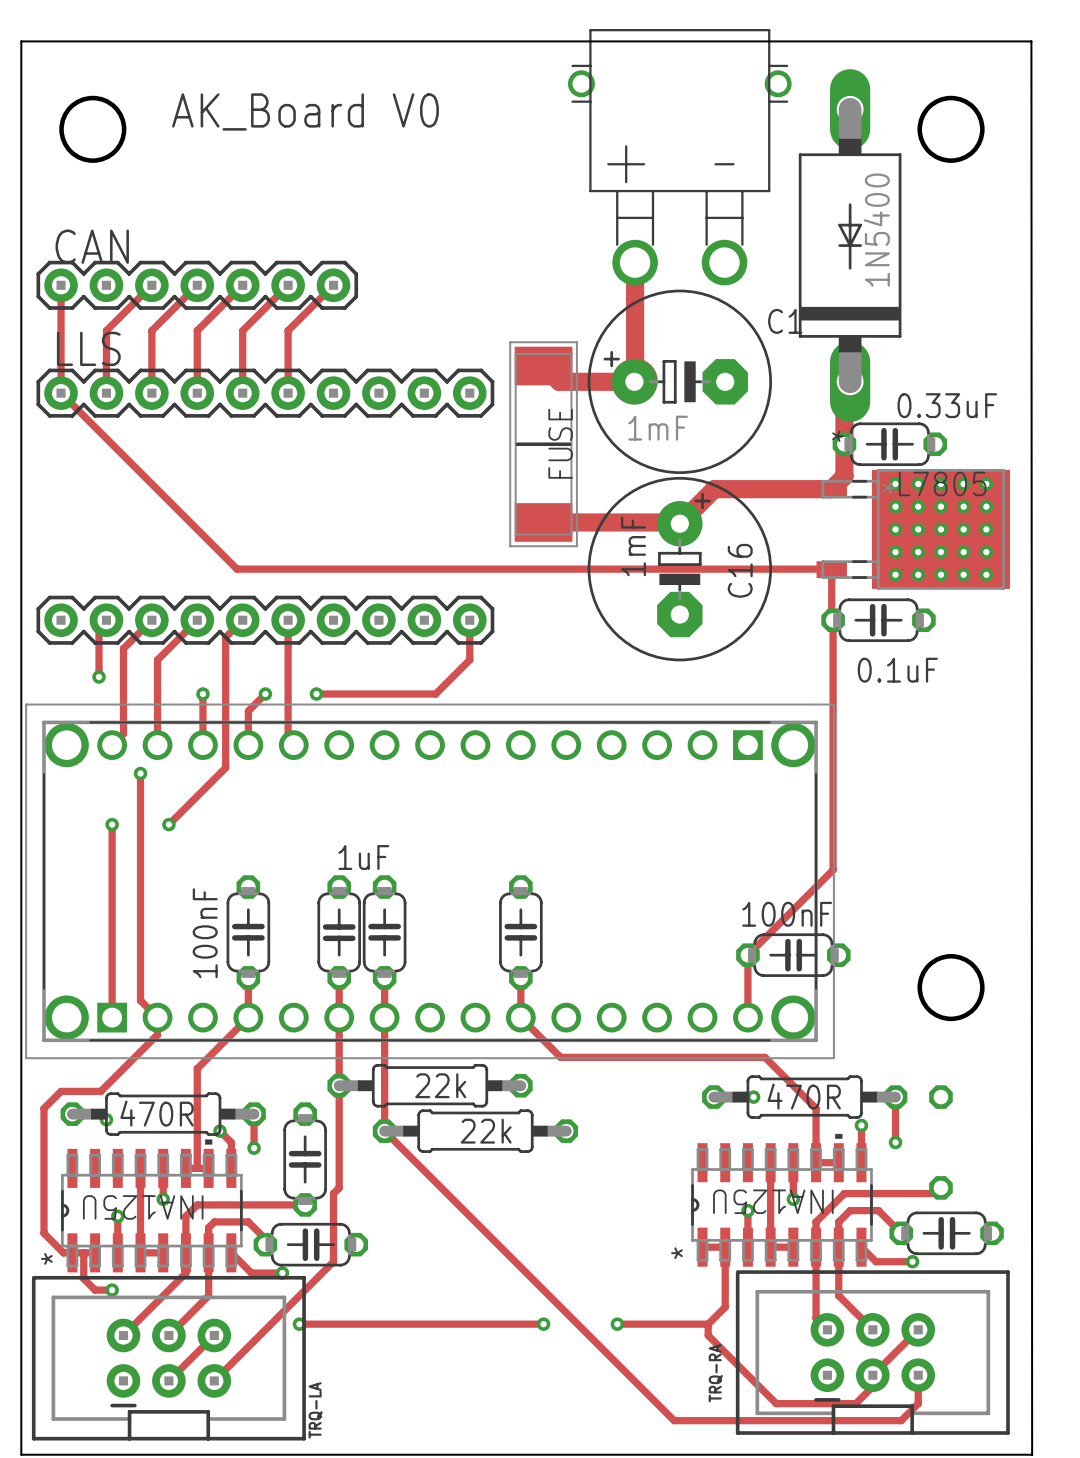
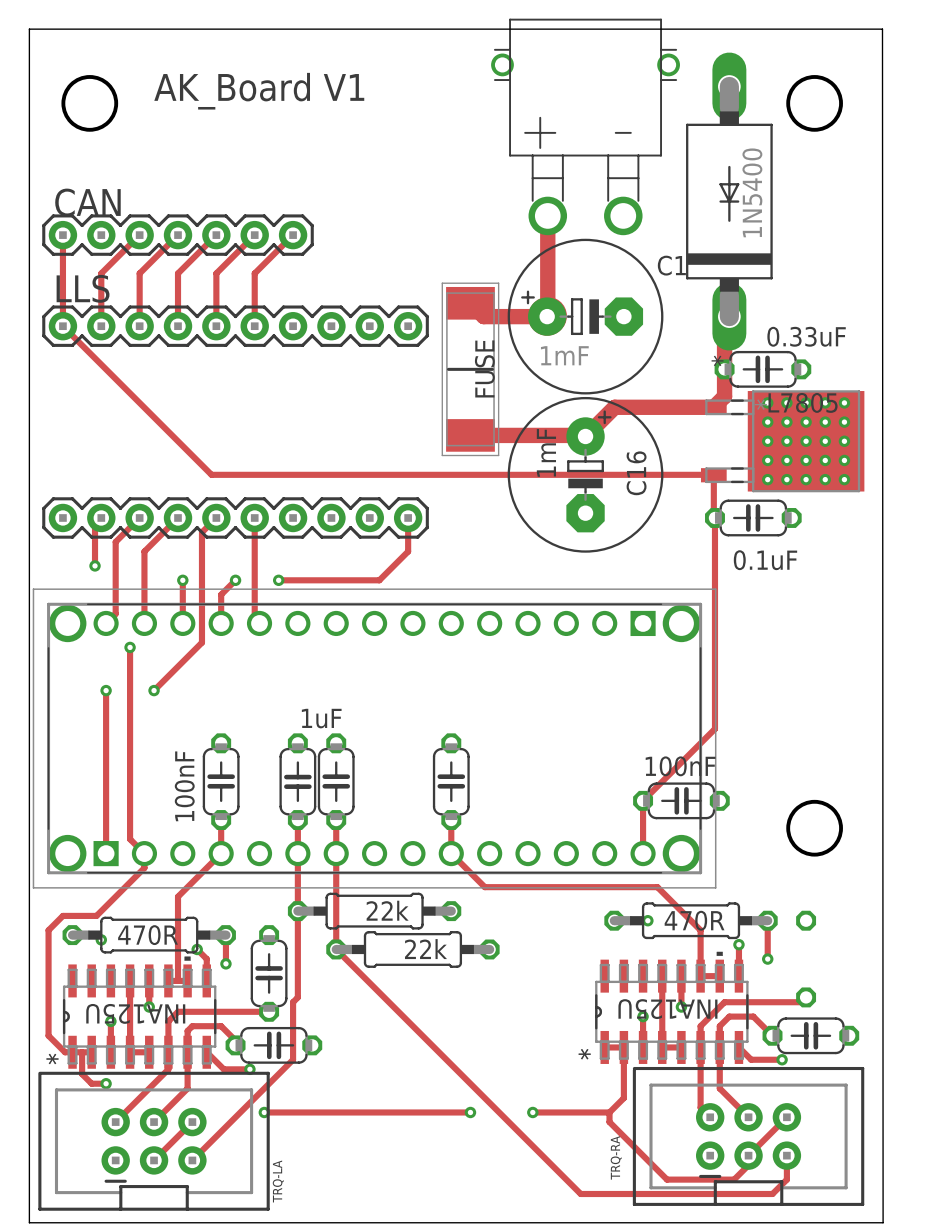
text: AK_Board V0 (305, 111) -> AK_Board V1 (259, 91)

